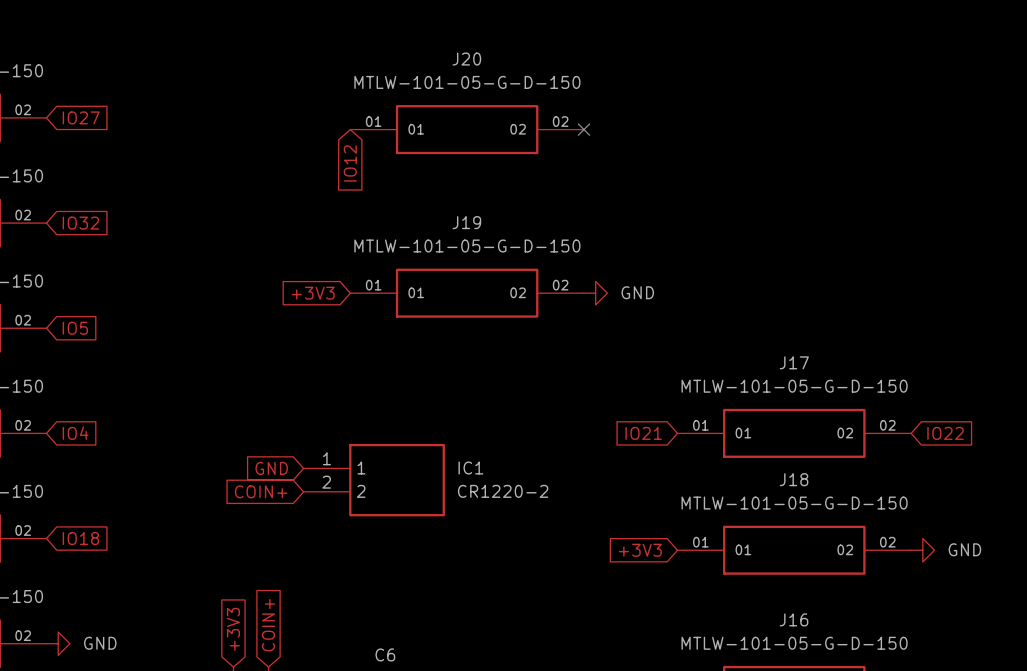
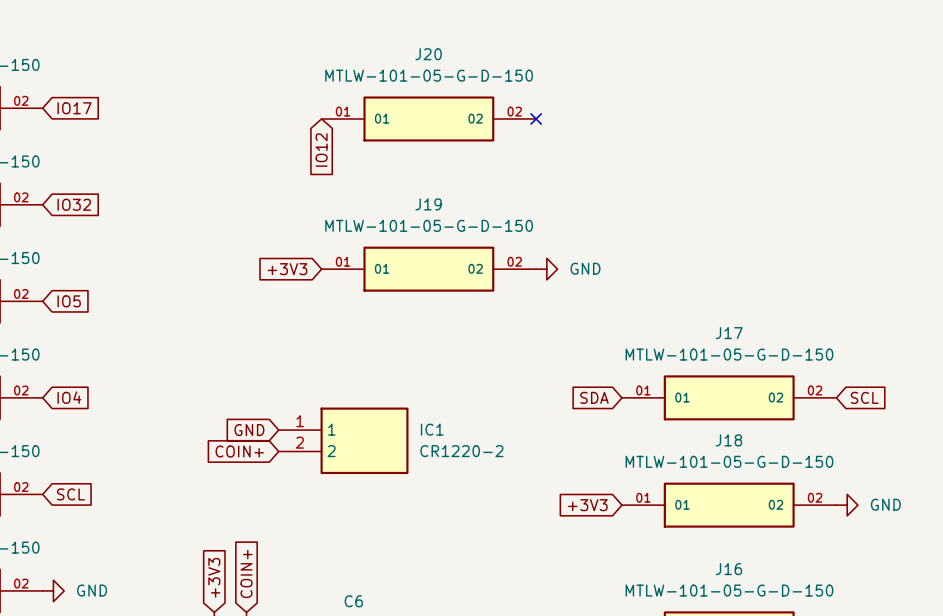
global label: IO27 (81, 117) -> IO17 (74, 108)
global label: IO21 (643, 433) -> SDA (594, 397)
global label: IO22 (945, 433) -> SCL (864, 397)
global label: IO18 (80, 538) -> SCL (70, 494)

